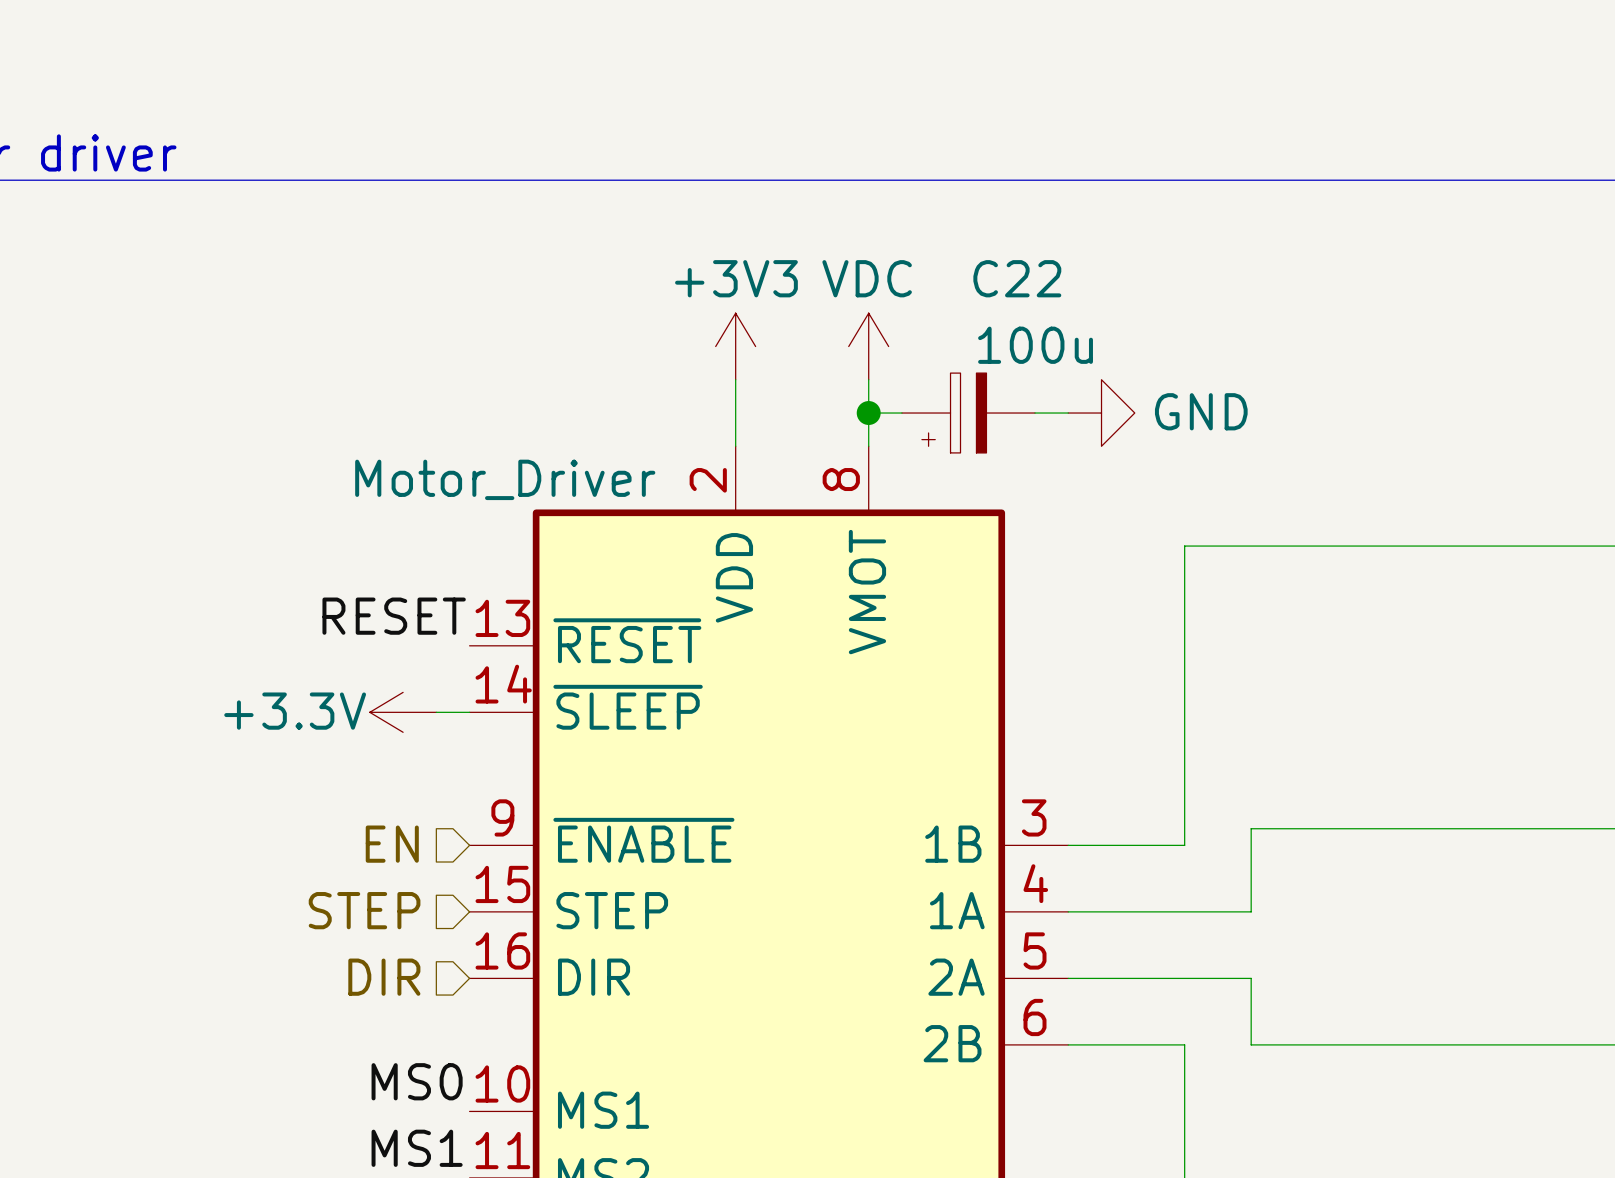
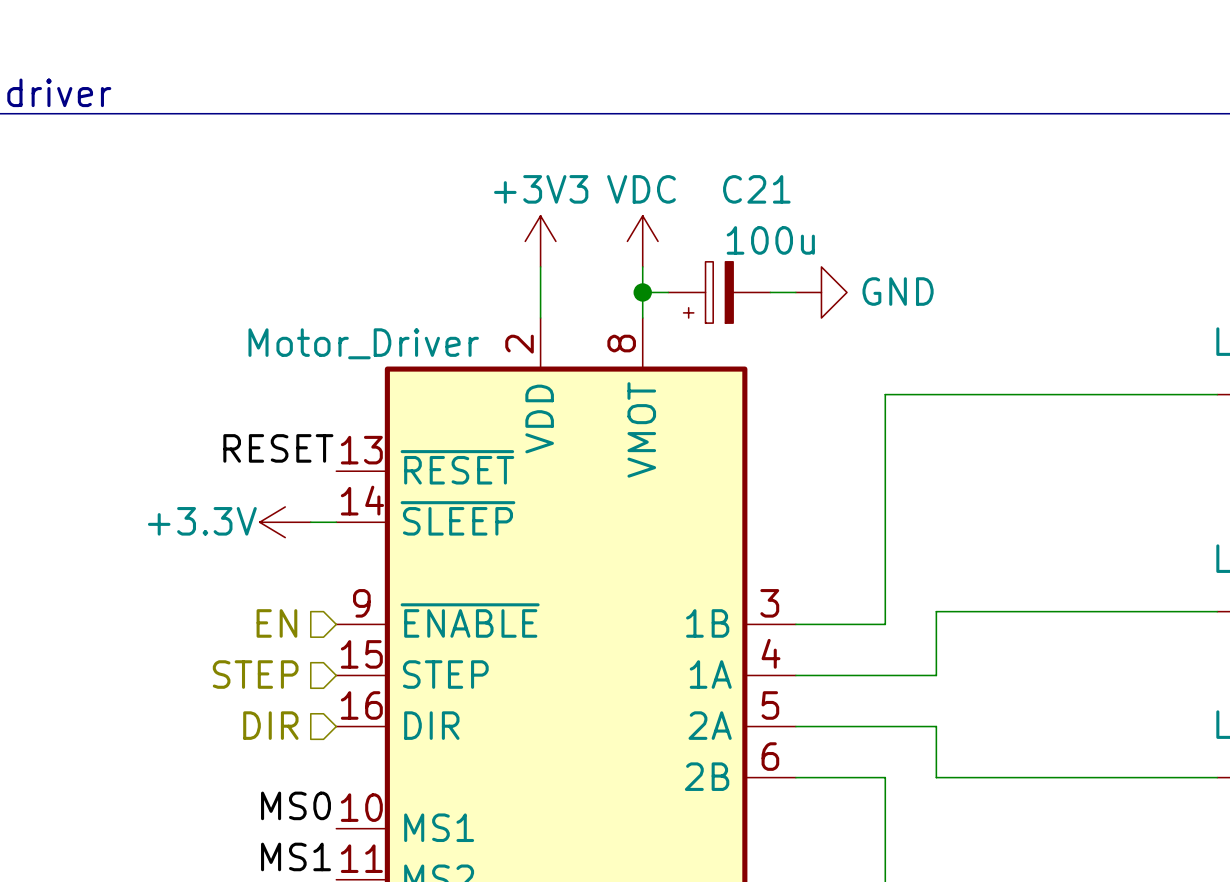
C22 name: C22 (1017, 278) -> C21 (756, 189)

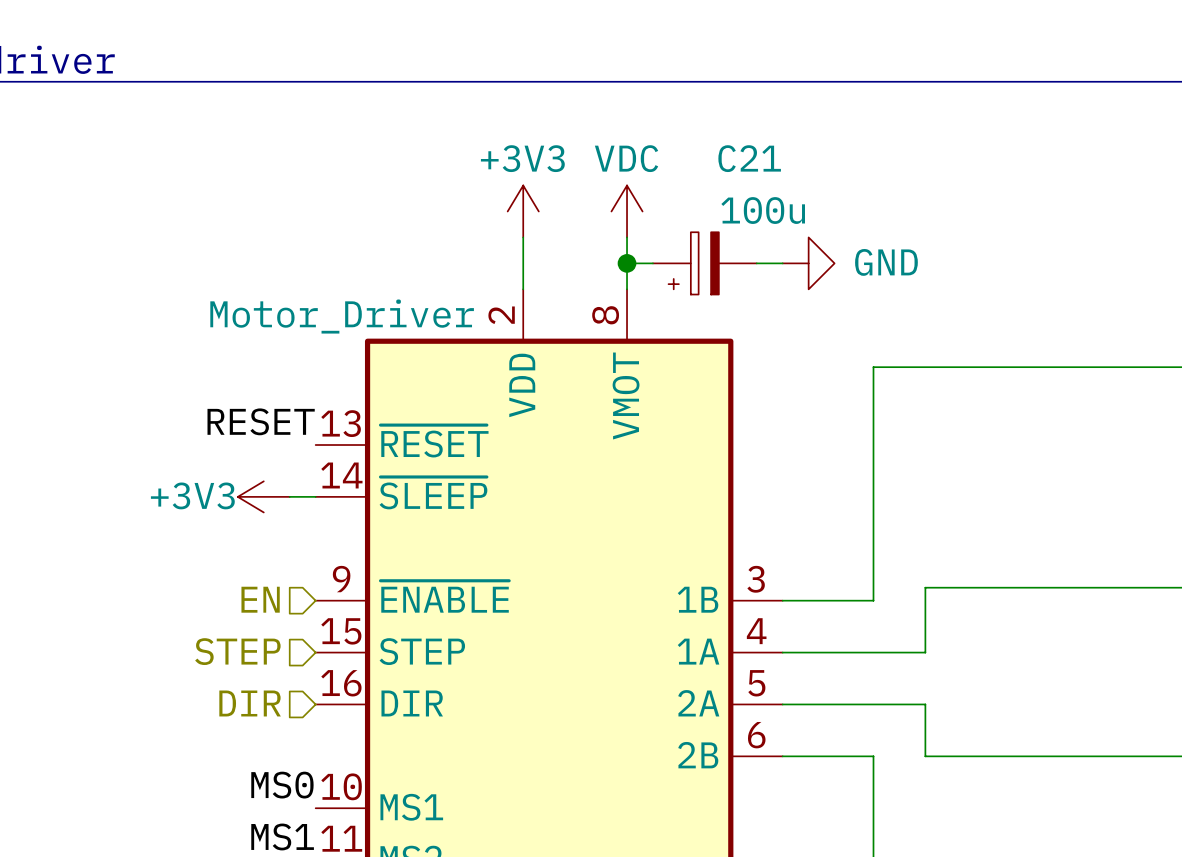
power symbol: +3.3V (285, 522) -> +3V3 (263, 496)

